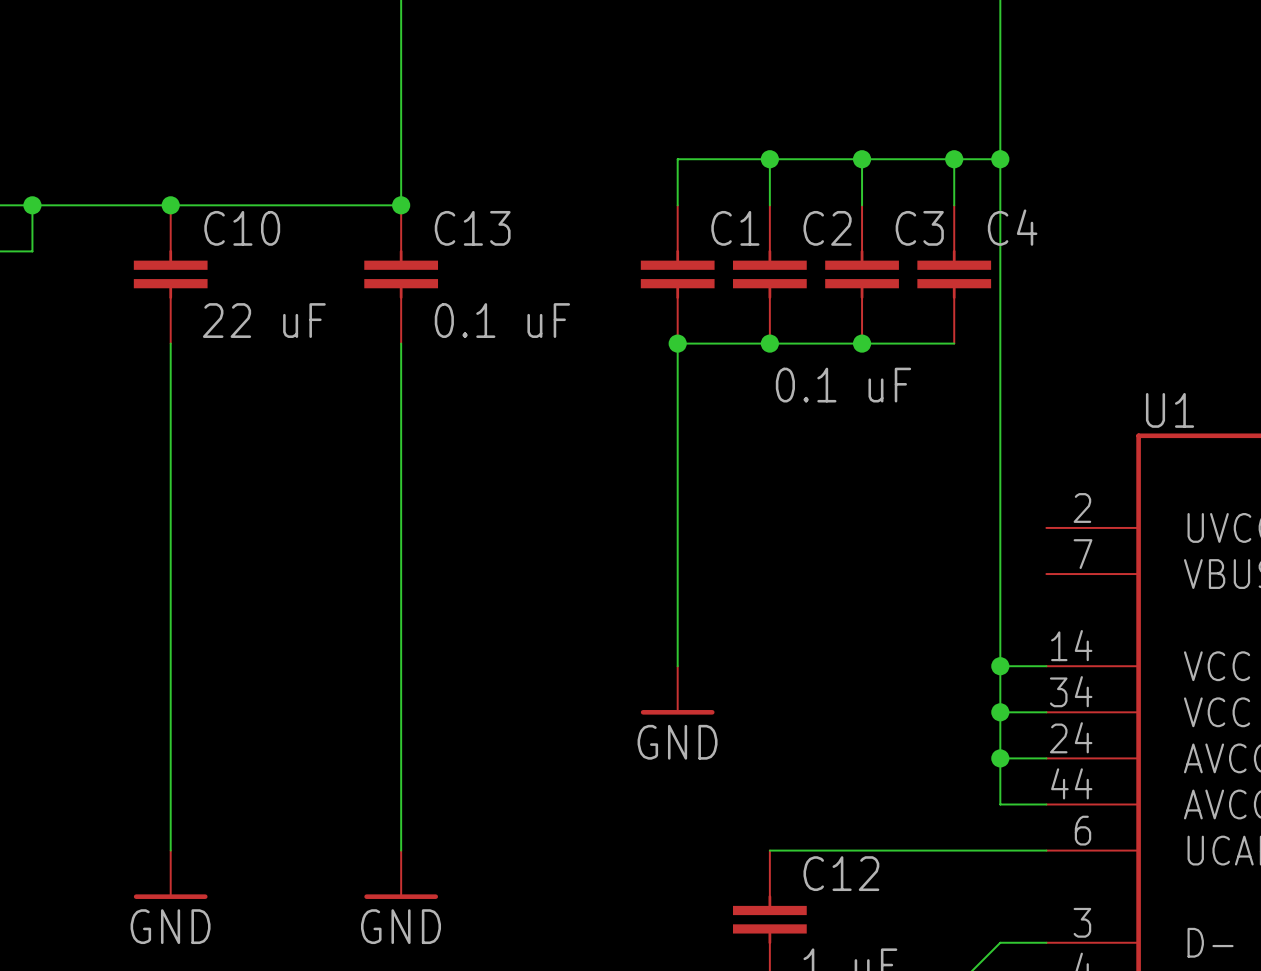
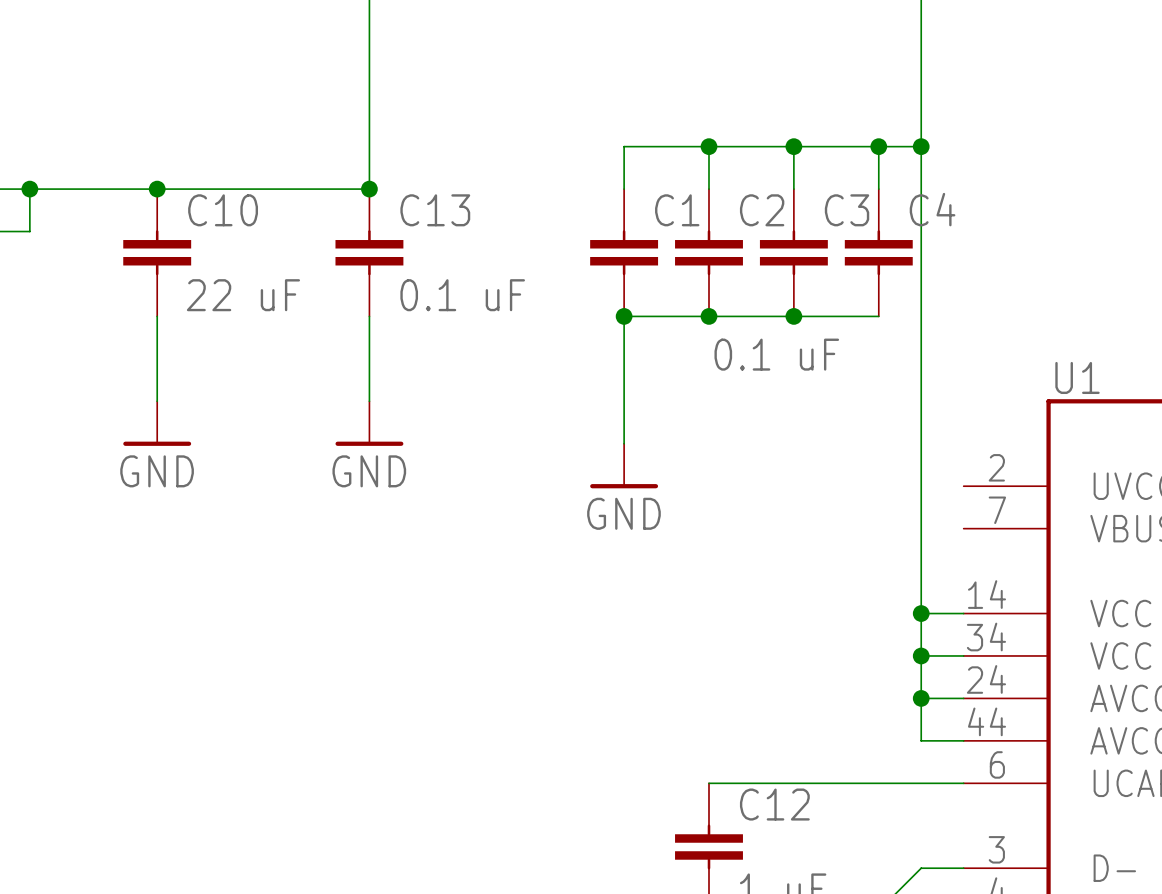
wire: (170, 435) (170, 850) -> none
wire: (401, 435) (401, 850) -> none
power symbol: none -> GND (157, 423)
power symbol: none -> GND (369, 423)
wire: (677, 481) (677, 666) -> none
power symbol: none -> GND (624, 466)
power symbol: GND (677, 690) -> none
power symbol: GND (170, 874) -> none
power symbol: GND (401, 874) -> none

